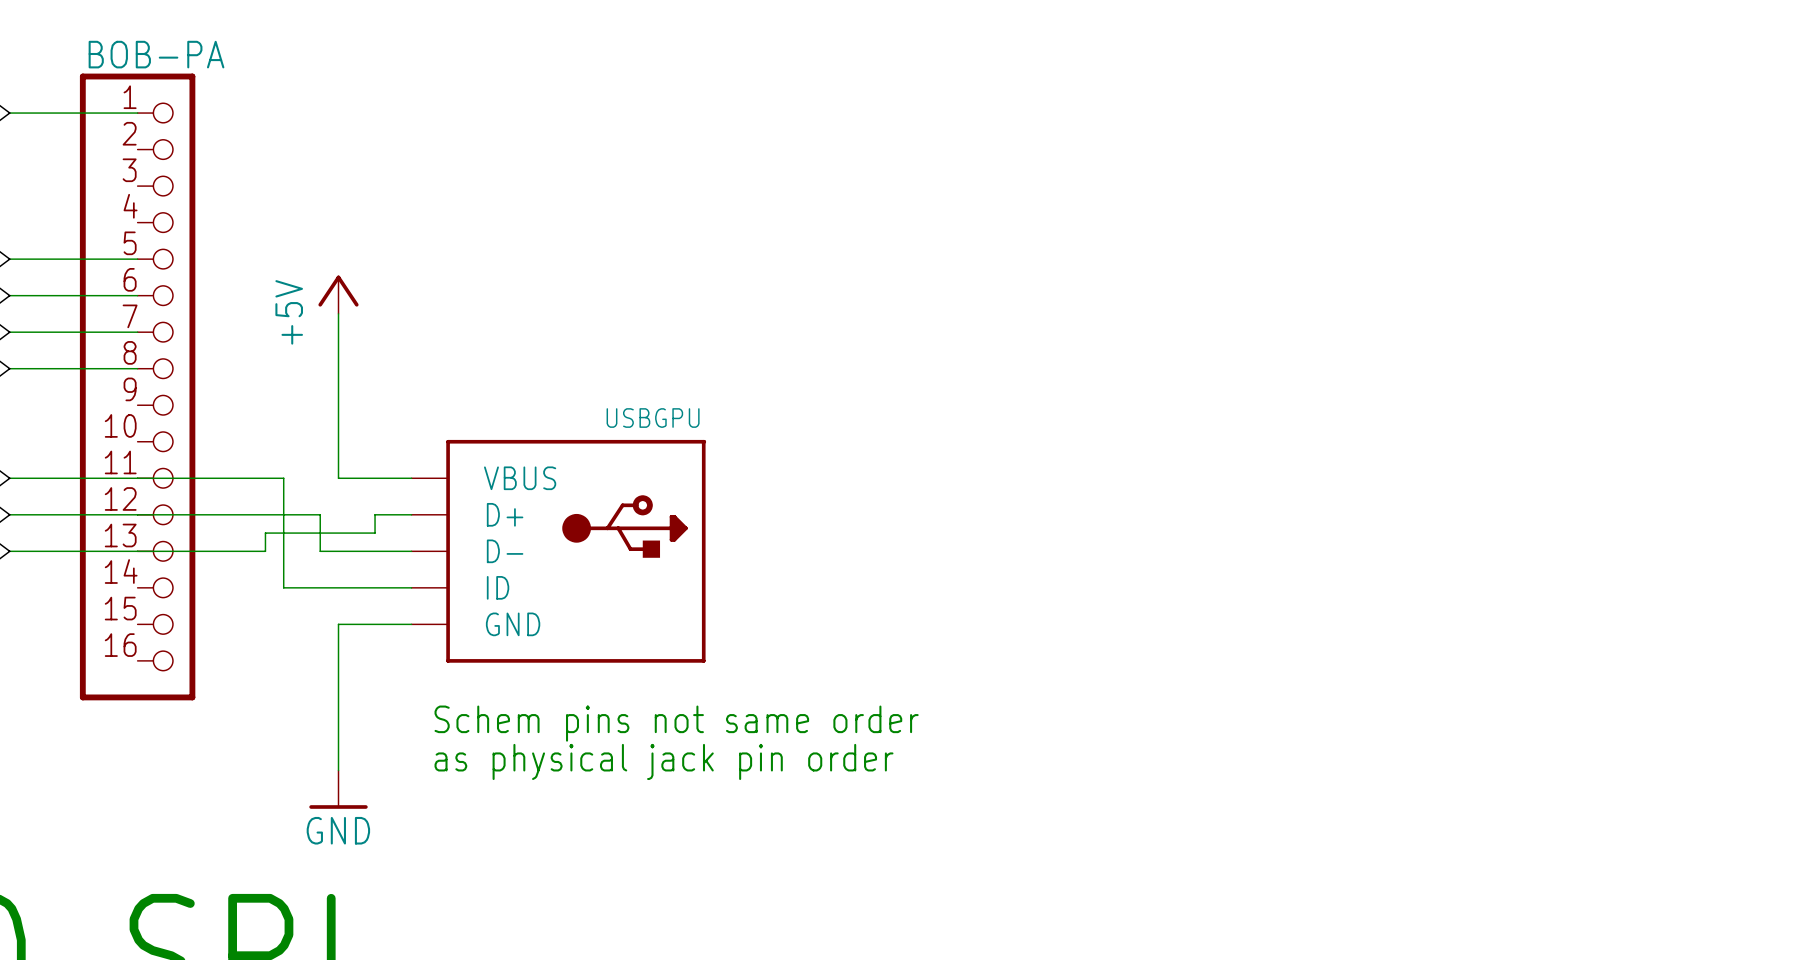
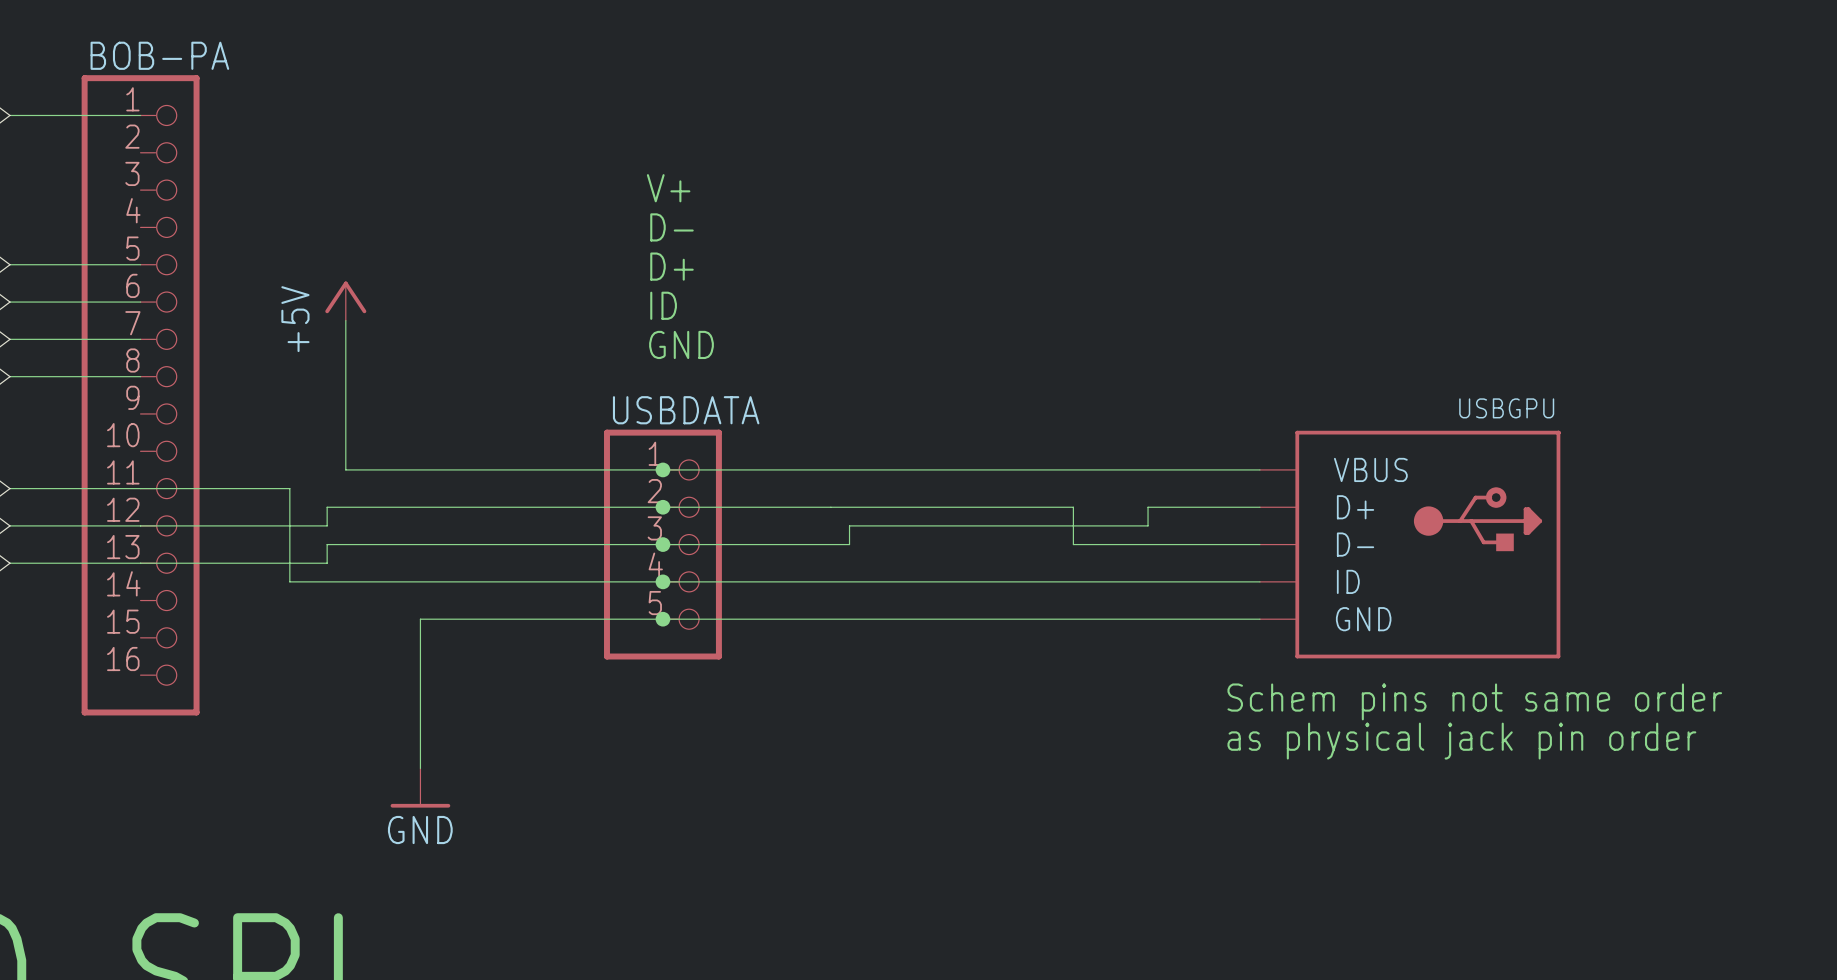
text: none -> V+ (668, 188)
text: none -> D- (671, 227)
text: none -> D+ (671, 266)
text: none -> ID (663, 305)
text: none -> GND (681, 344)
wire: (338, 460) (338, 478) (411, 478) -> (345, 469) (1259, 469)
junction: none -> (662, 469)
junction: none -> (662, 507)
wire: (320, 514) (320, 533) (265, 533) (265, 551) -> (327, 563) (271, 563)
wire: none -> (327, 525) (327, 507) (1073, 507) (1073, 544) (1259, 544)
wire: (411, 514) (375, 514) (375, 533) -> (1259, 507) (1148, 507) (1148, 525) (849, 525) (849, 544) (383, 544)
USBDATA: none -> (662, 544)
junction: none -> (662, 544)
USBGPU: none -> (1410, 544)
wire: (320, 551) (411, 551) -> none
USBGPU: (558, 551) -> none
wire: (283, 569) (283, 587) (411, 587) -> (289, 581) (1259, 581)
junction: none -> (662, 581)
junction: none -> (662, 619)
wire: none -> (1259, 619) (420, 619) (420, 768)
wire: (411, 624) (338, 624) (338, 770) -> none
text: none -> Schem pins not same order (1474, 701)
text: Schem pins not same order (676, 723) -> none
text: none -> as physical jack pin order (1461, 741)
text: as physical jack pin order (664, 761) -> none
power symbol position: GND (338, 789) -> GND (420, 788)

